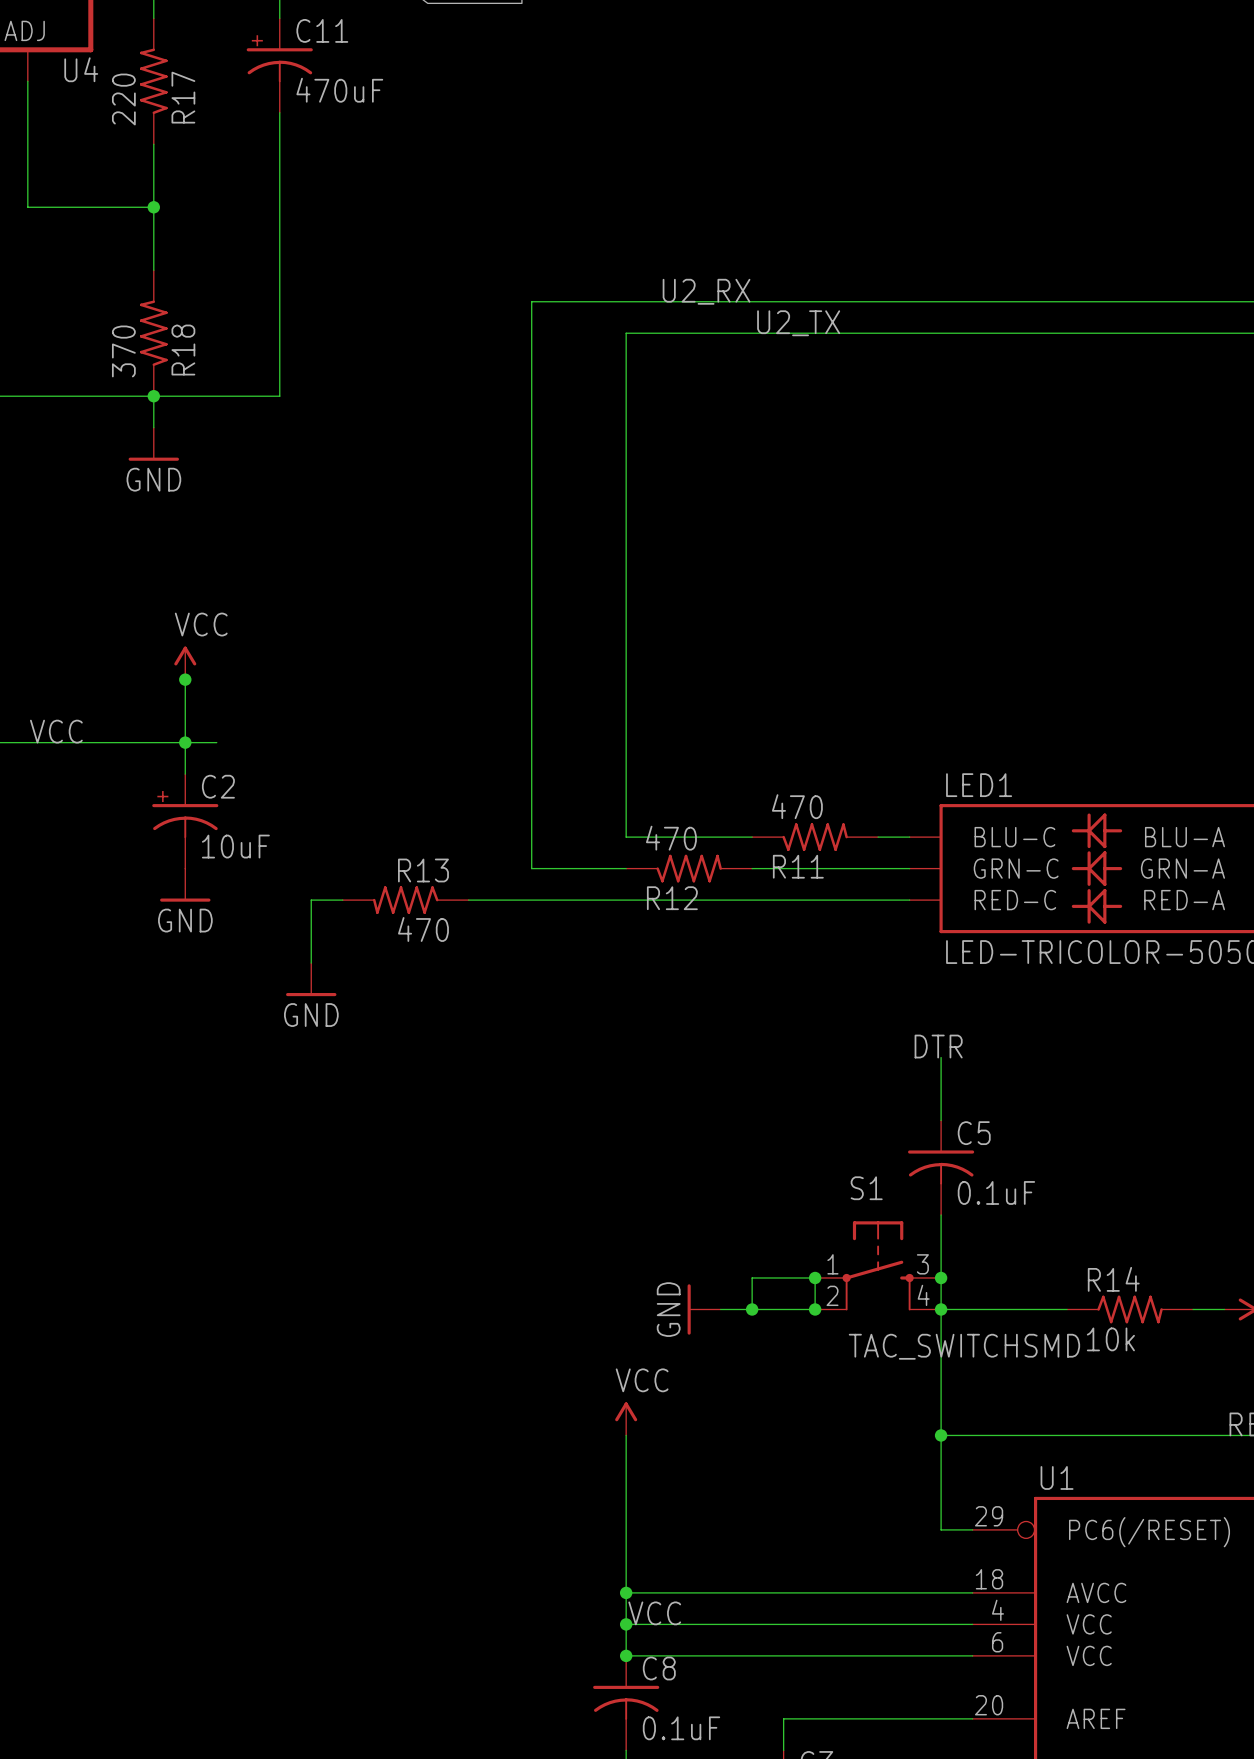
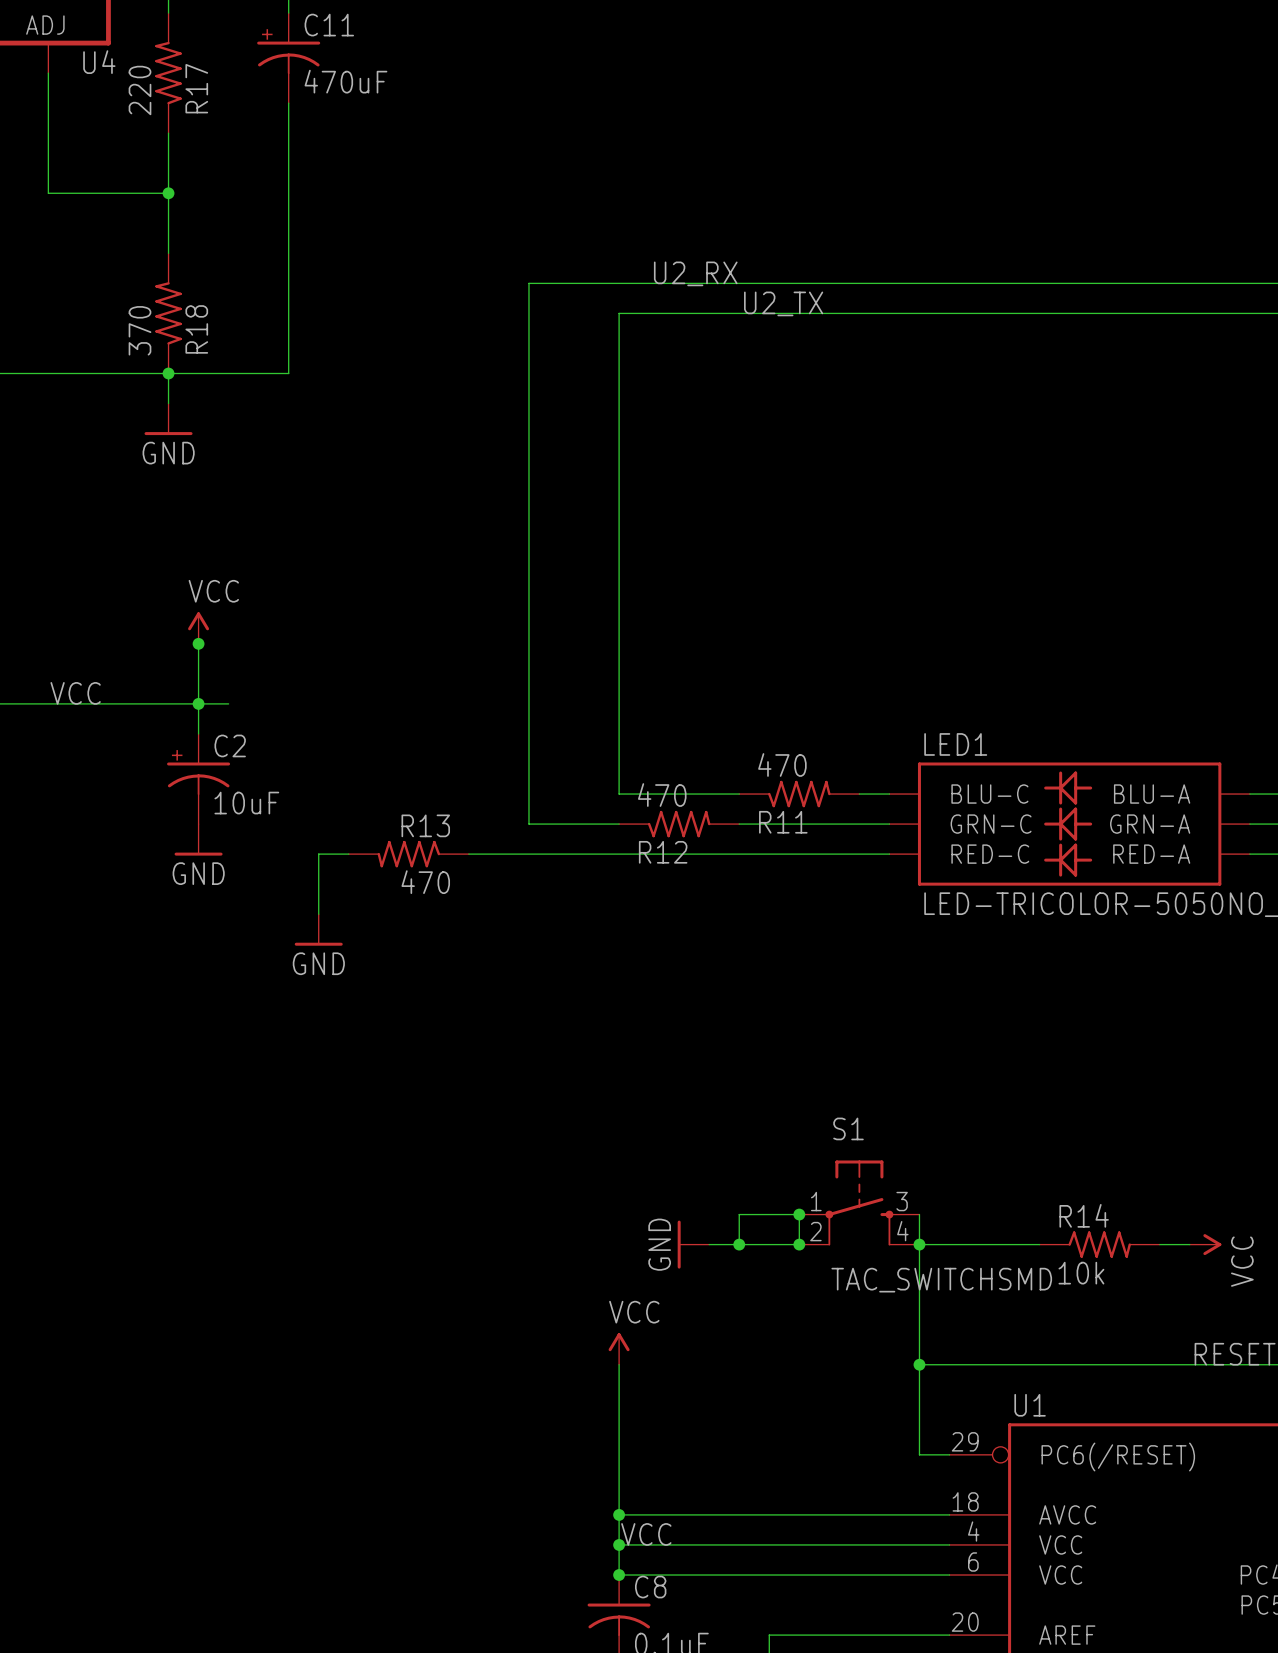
label: DTR (938, 1046) -> none
wire: (941, 1057) (941, 1120) -> none
C5: 0.1uF (941, 1167) -> none
wire: (941, 1215) (941, 1277) -> none
junction: (941, 1277) -> none

